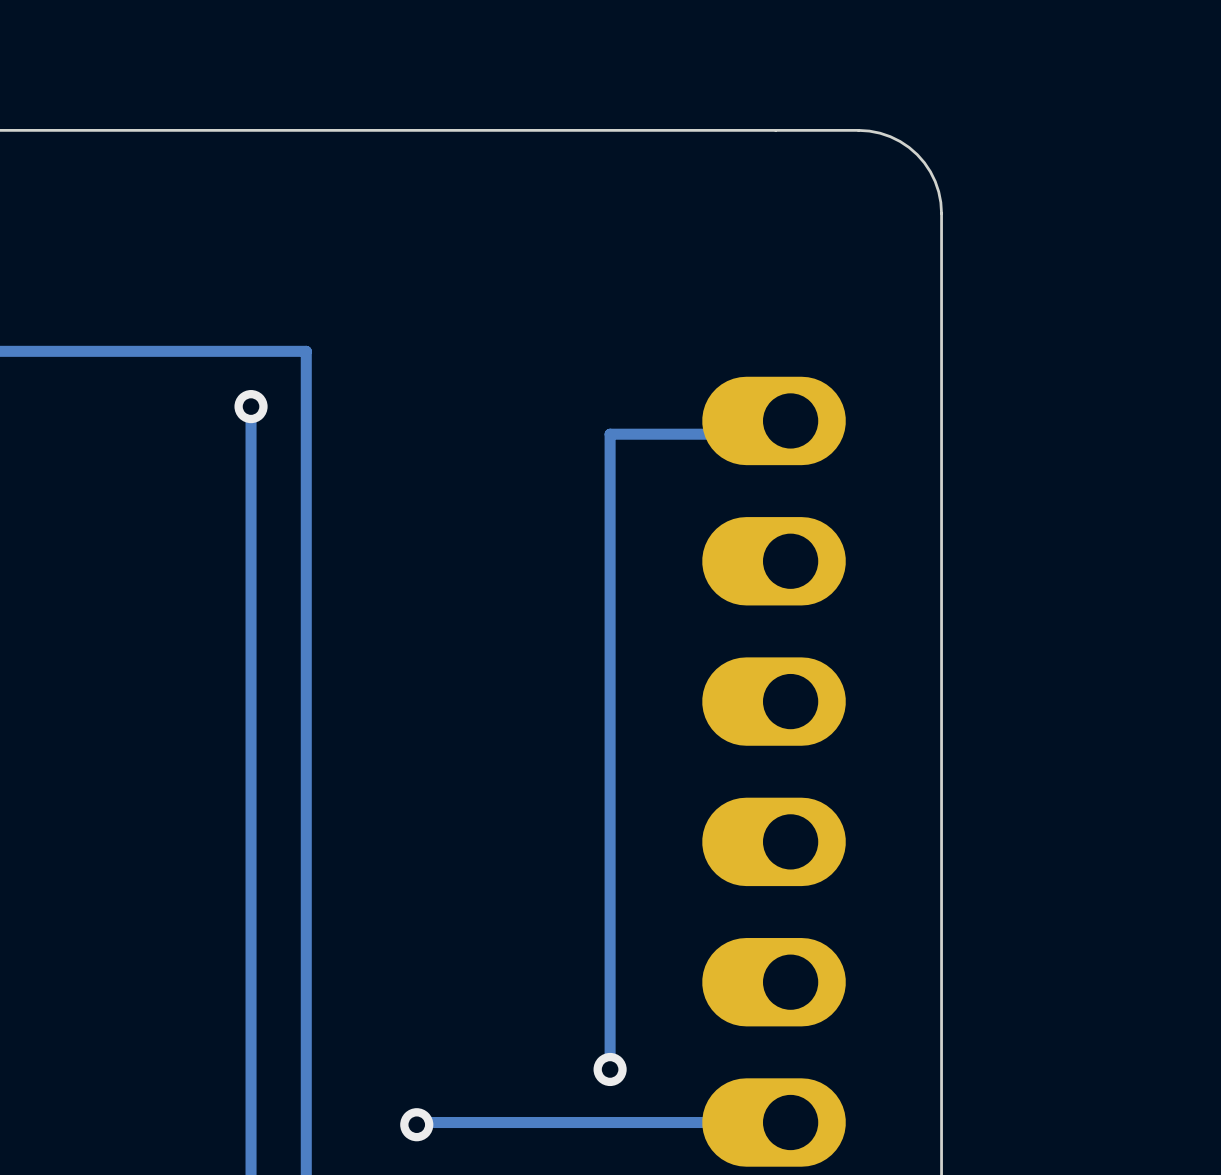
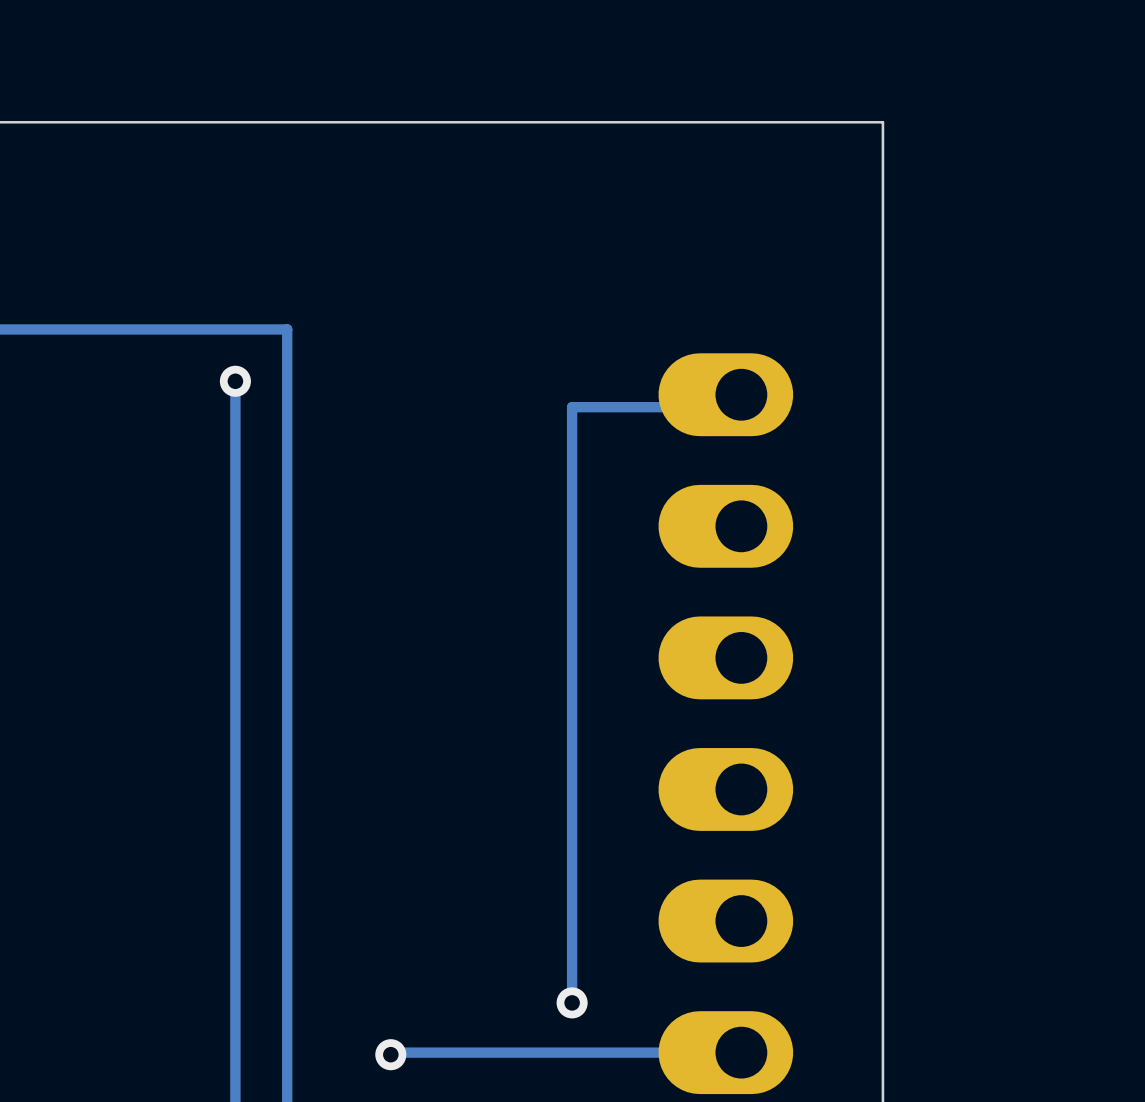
board edge: (858, 130) (890, 136) (917, 154) (935, 181) (941, 213) -> (805, 122) (882, 122) (882, 199)

